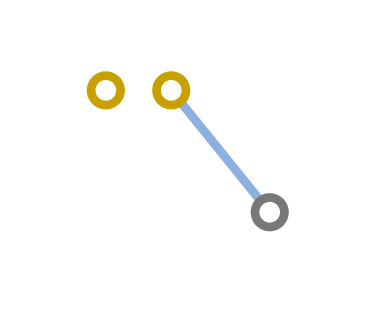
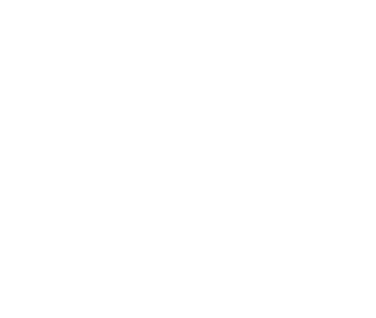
part: (138, 90) -> none
track: (171, 90) (269, 212) -> none
via: (269, 212) -> none

